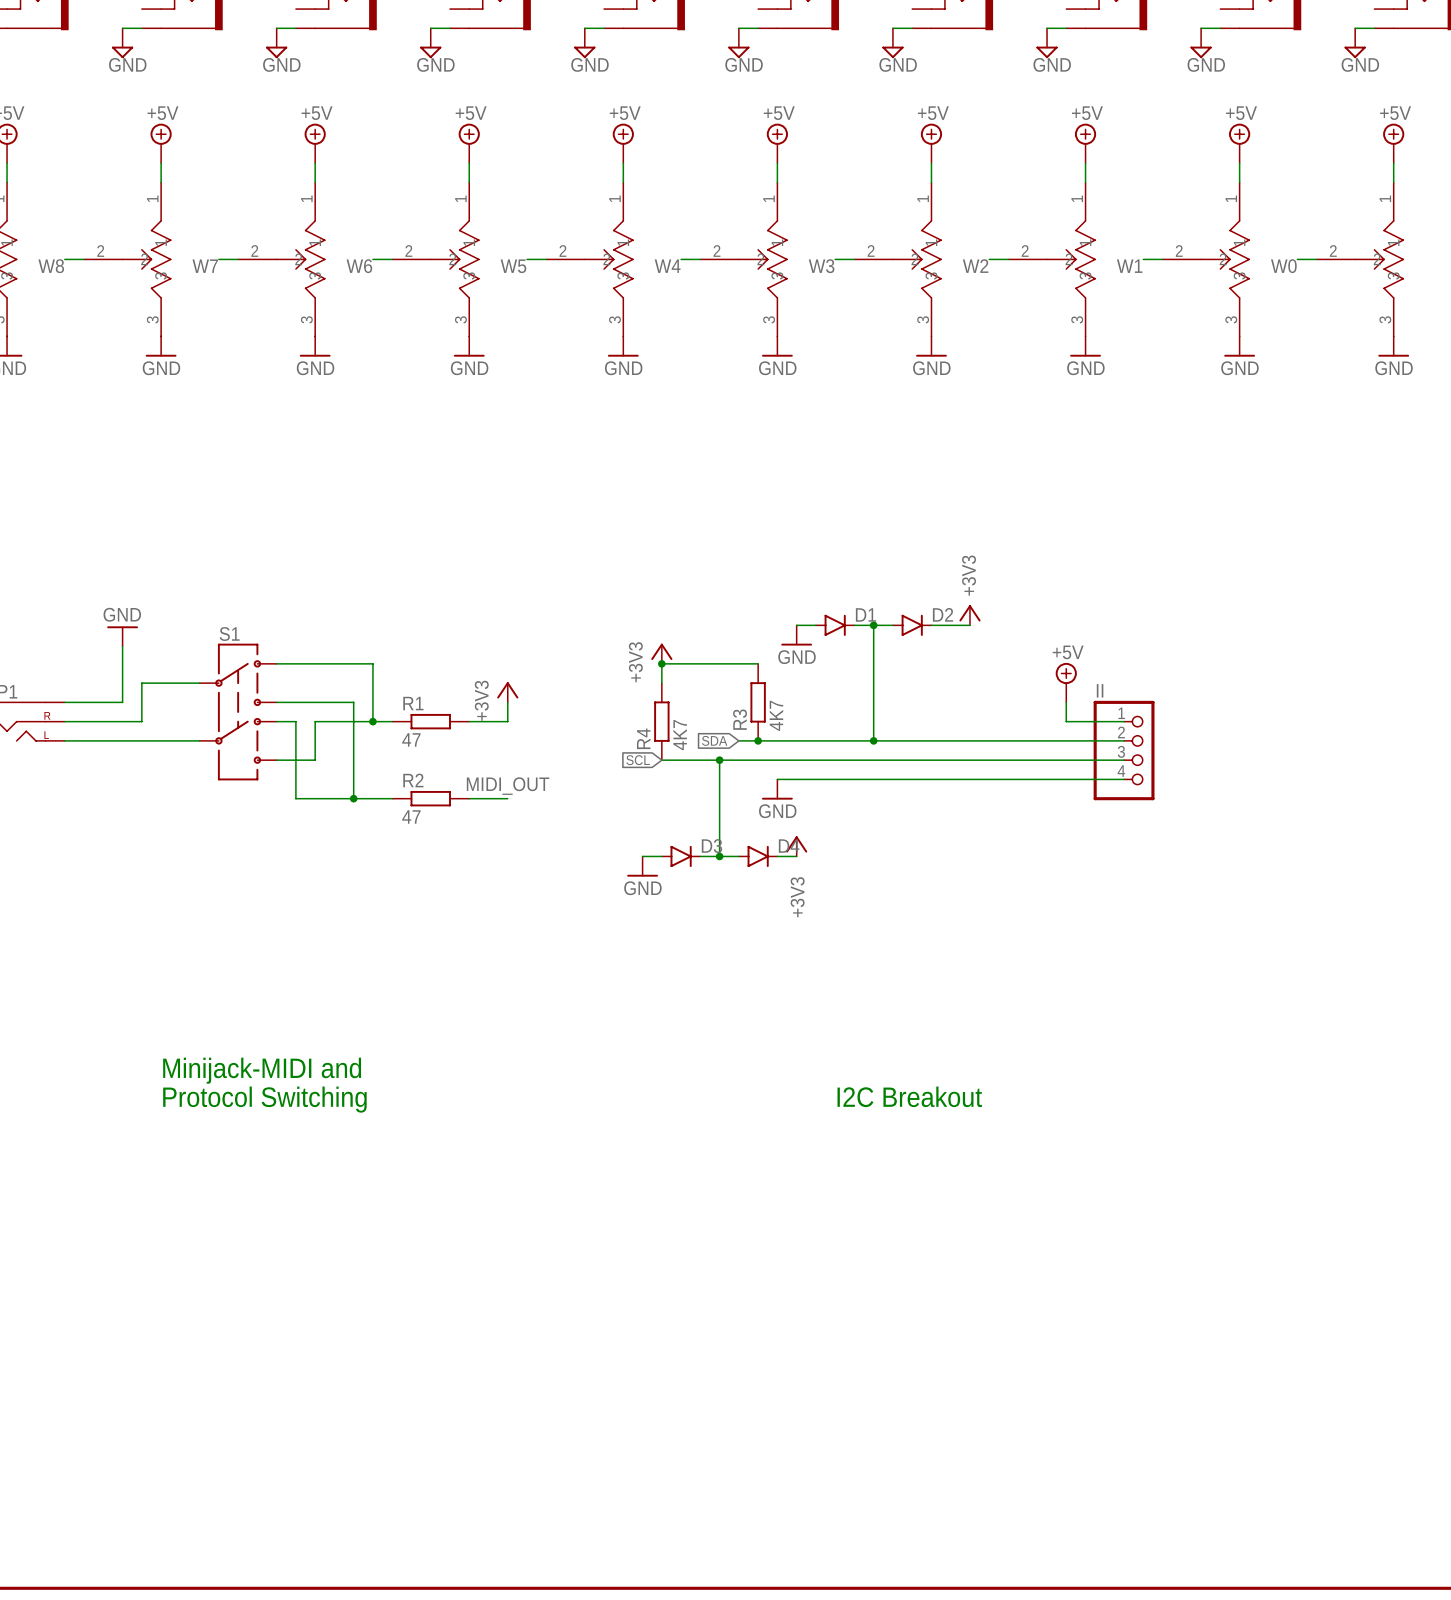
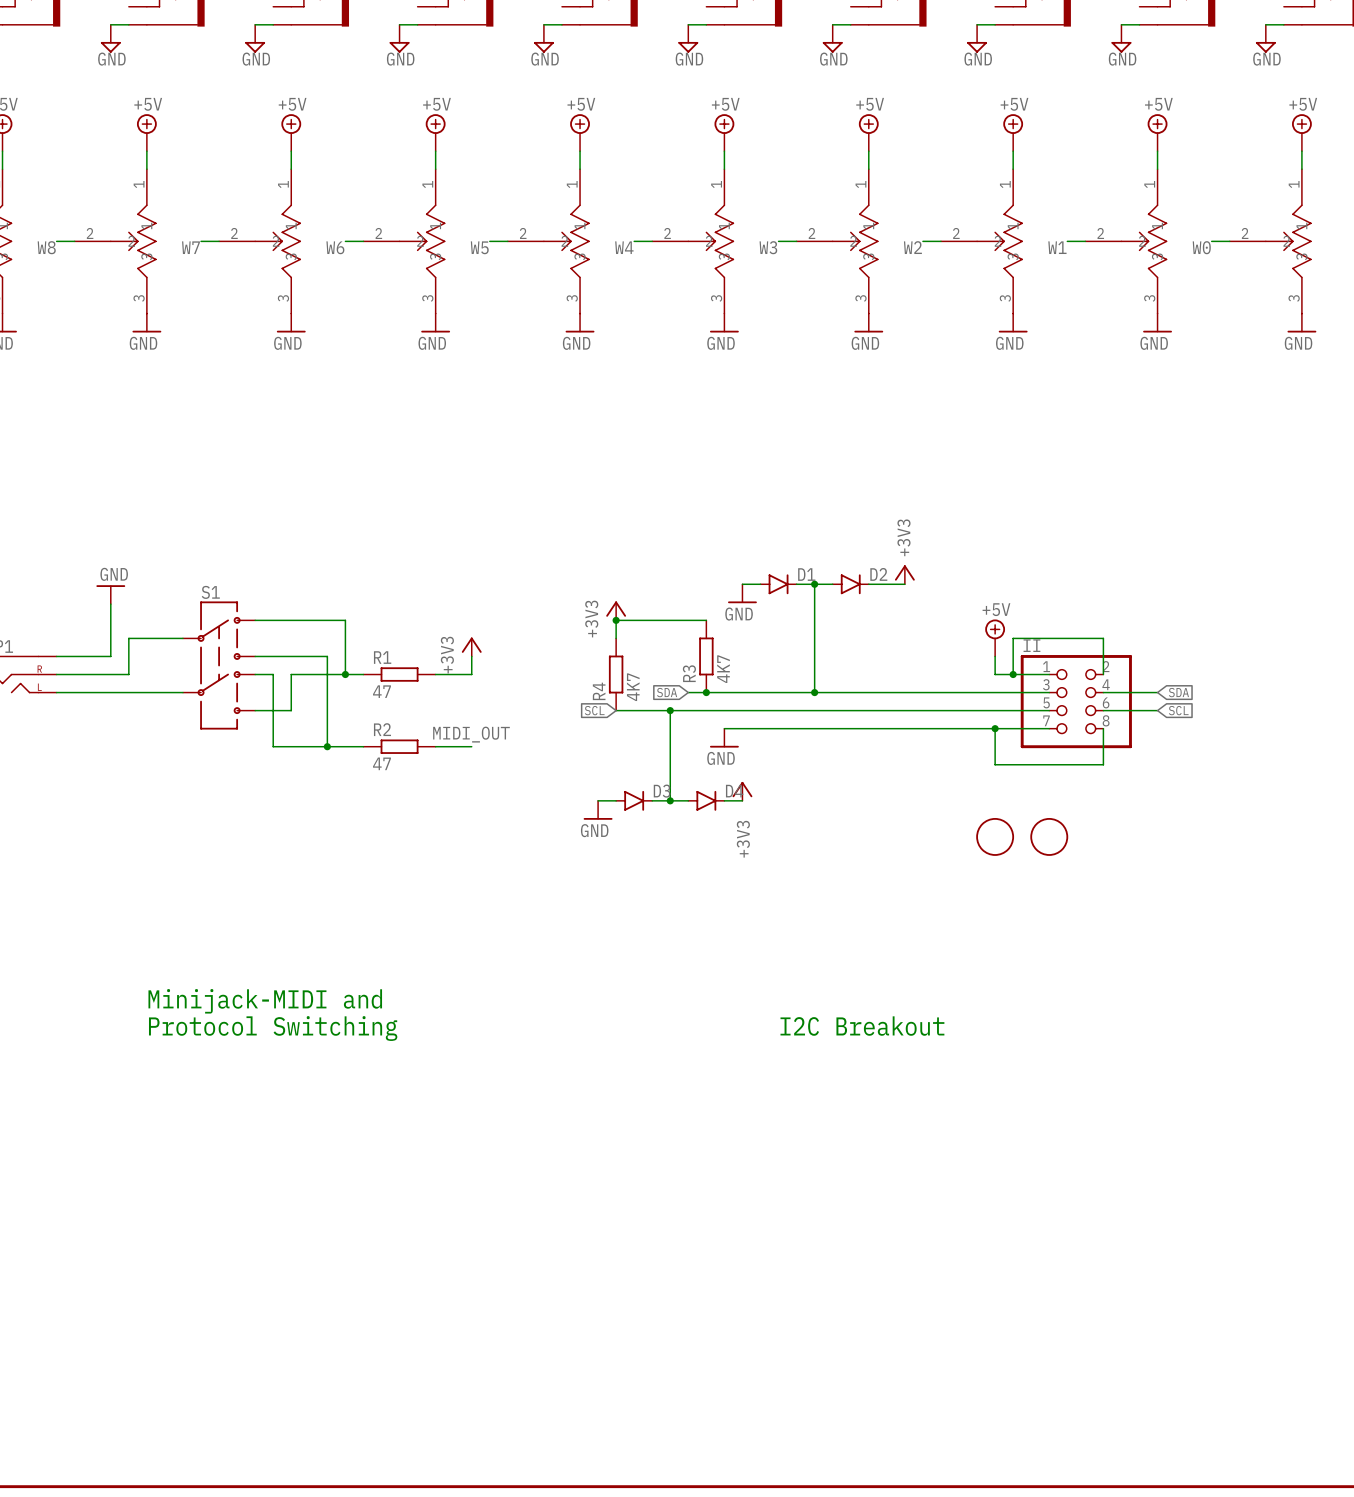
wire: none -> (1013, 674) (1013, 638) (1103, 638) (1103, 674)
junction: none -> (1013, 674)
wire: none -> (1103, 692) (1157, 692)
global label: none -> SDA (1178, 692)
II: (1124, 750) -> none
II: none -> (1076, 701)
wire: none -> (1103, 710) (1157, 710)
global label: none -> SCL (1178, 710)
wire: none -> (995, 728) (995, 764) (1103, 764) (1103, 728)
junction: none -> (995, 728)
part: none -> (995, 836)
part: none -> (1049, 836)

